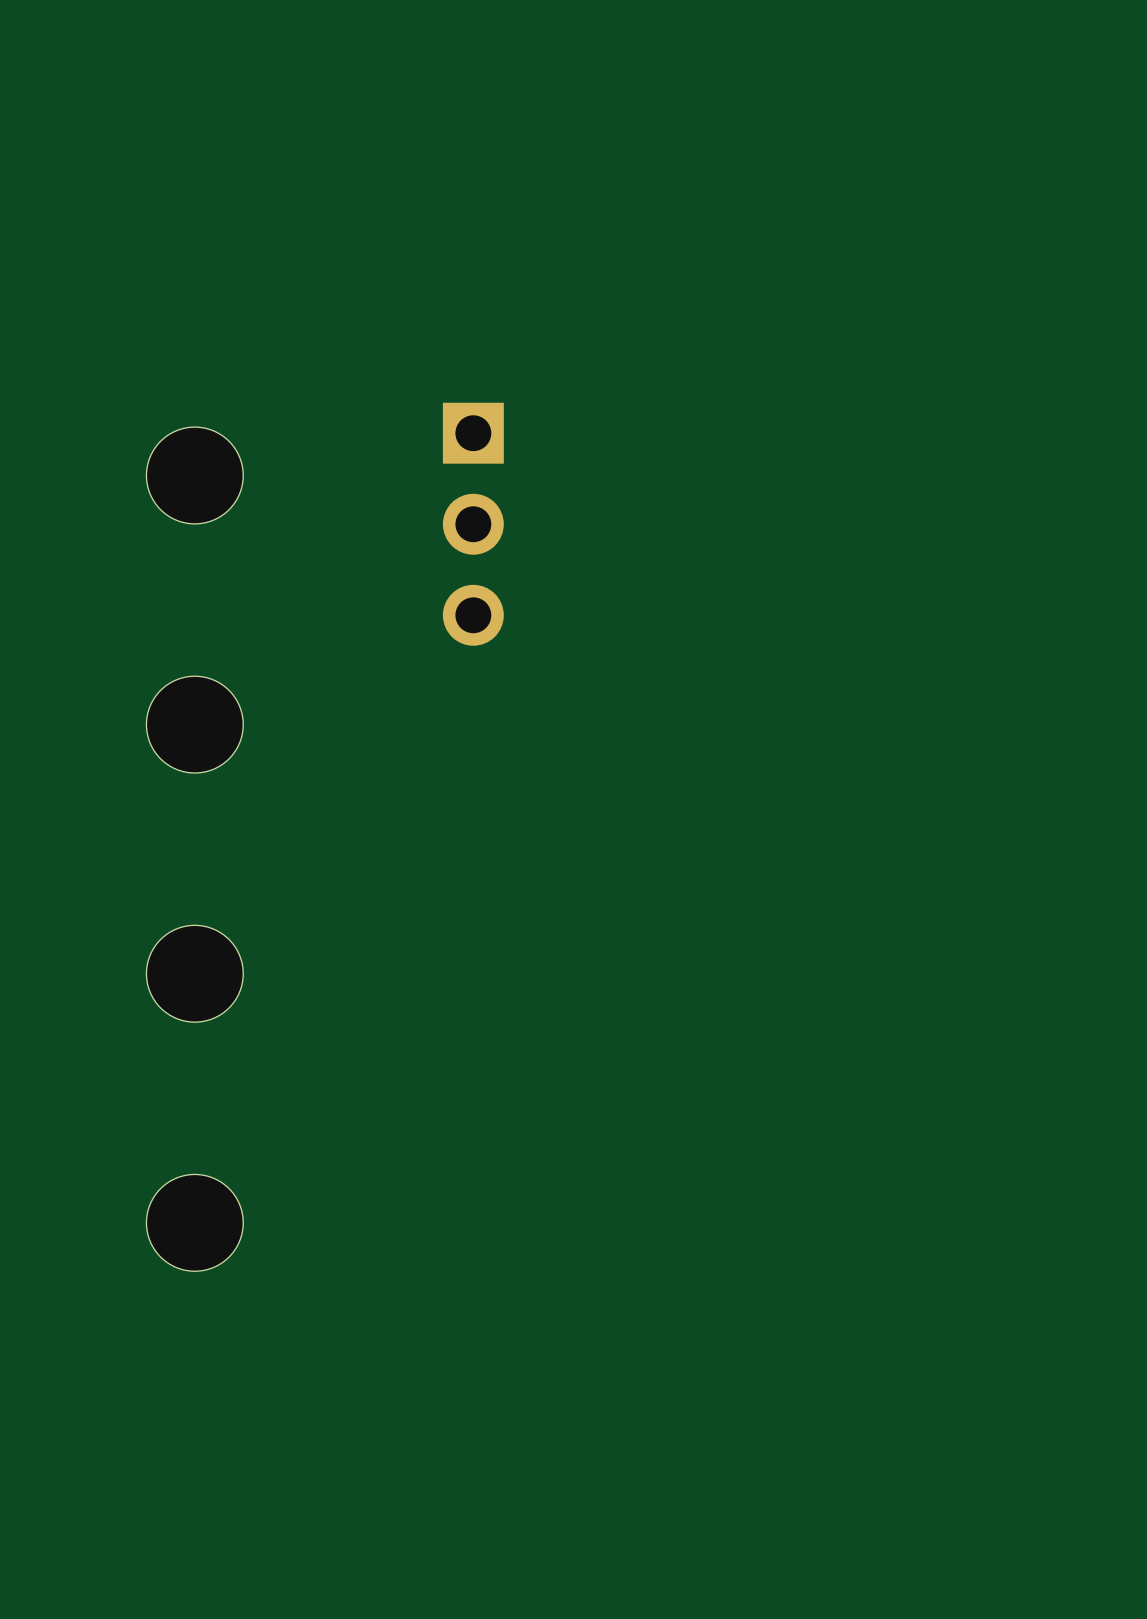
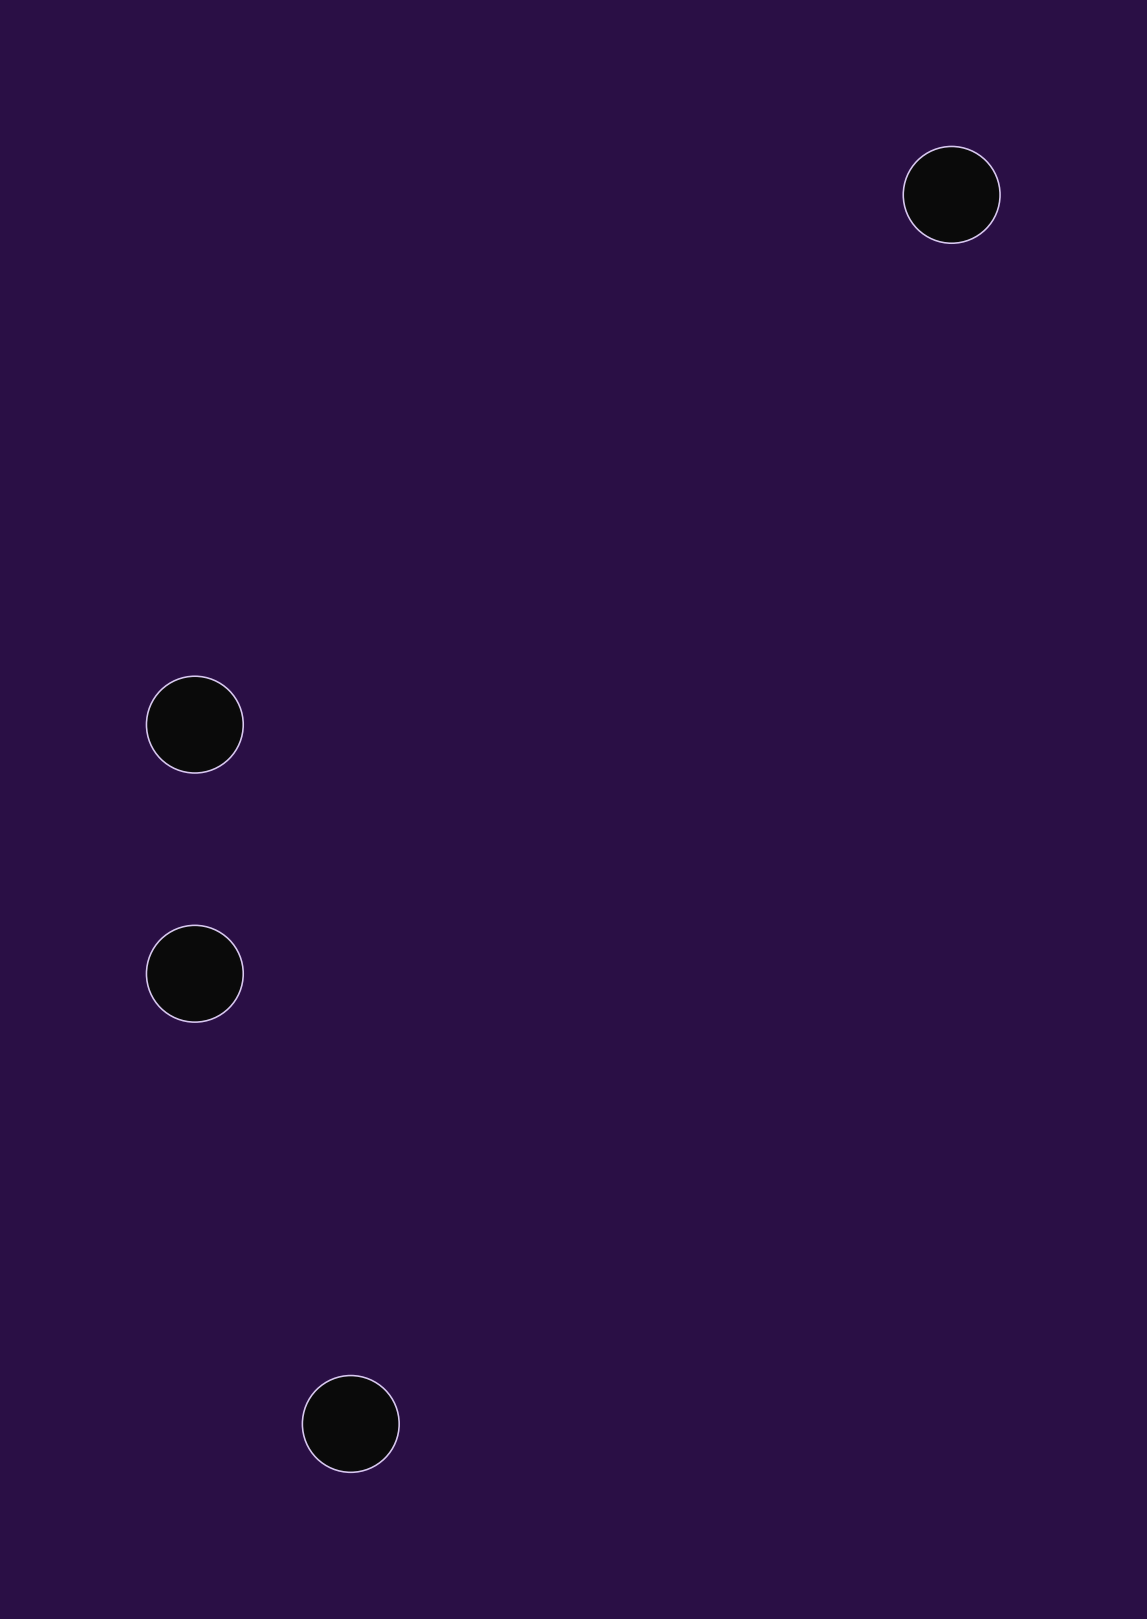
part: none -> (951, 194)
part: (194, 475) -> none
part: (473, 524) -> none
part position: (194, 1222) -> (350, 1423)

